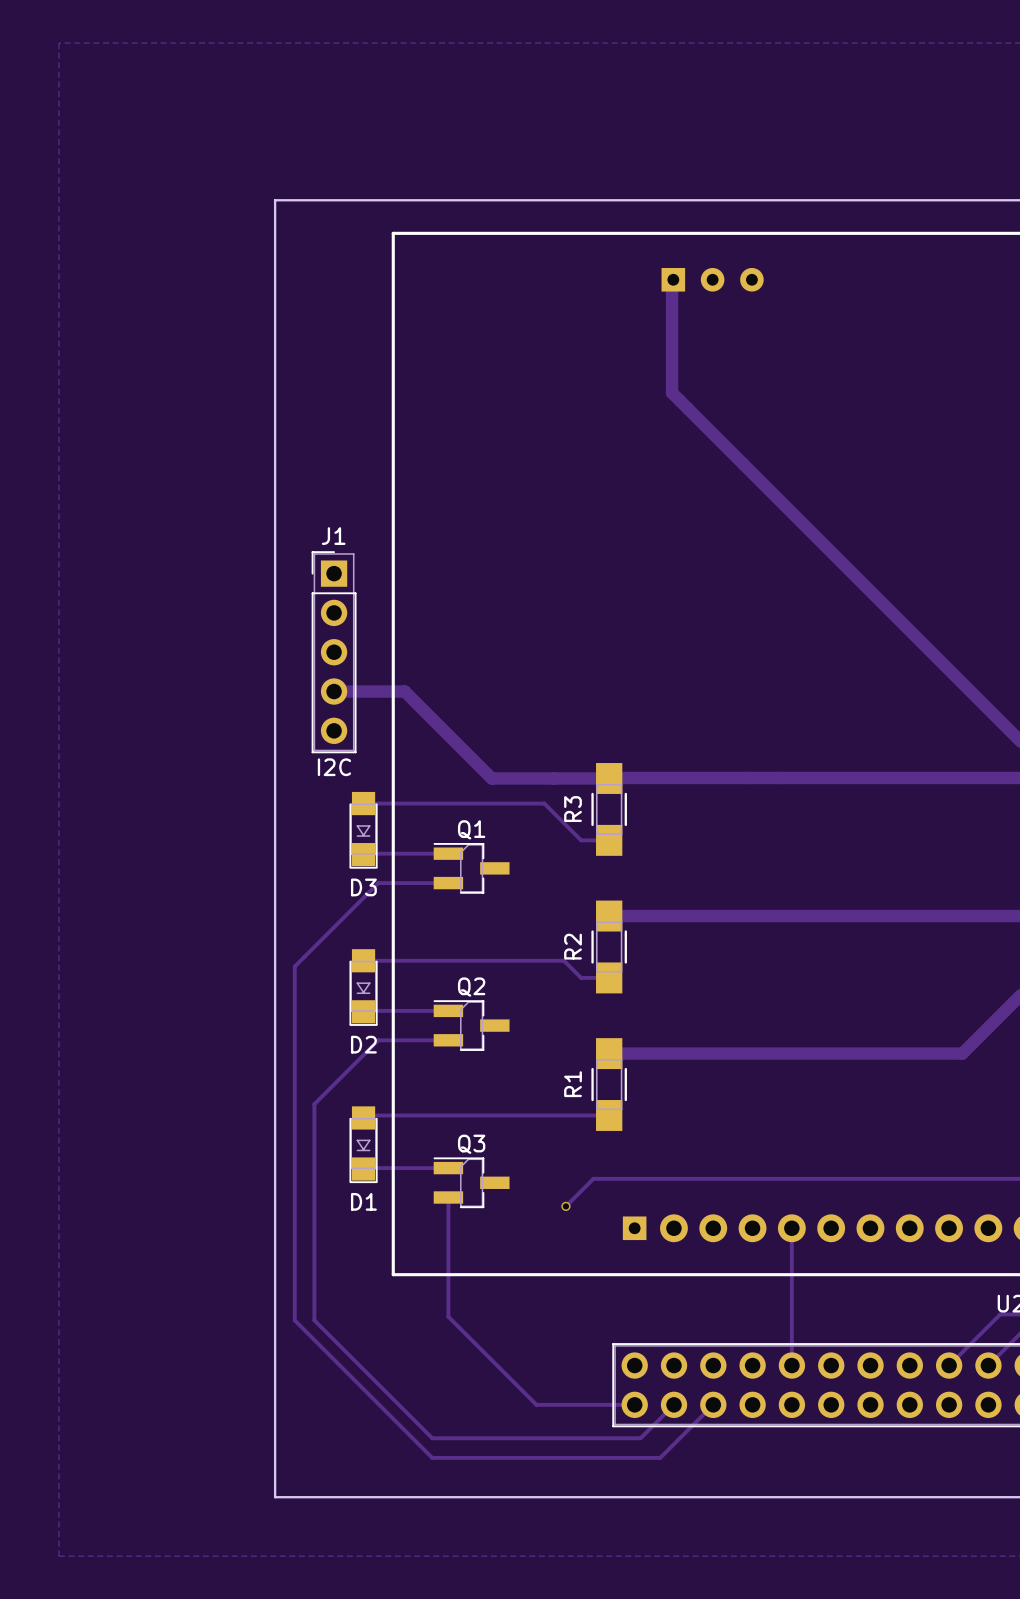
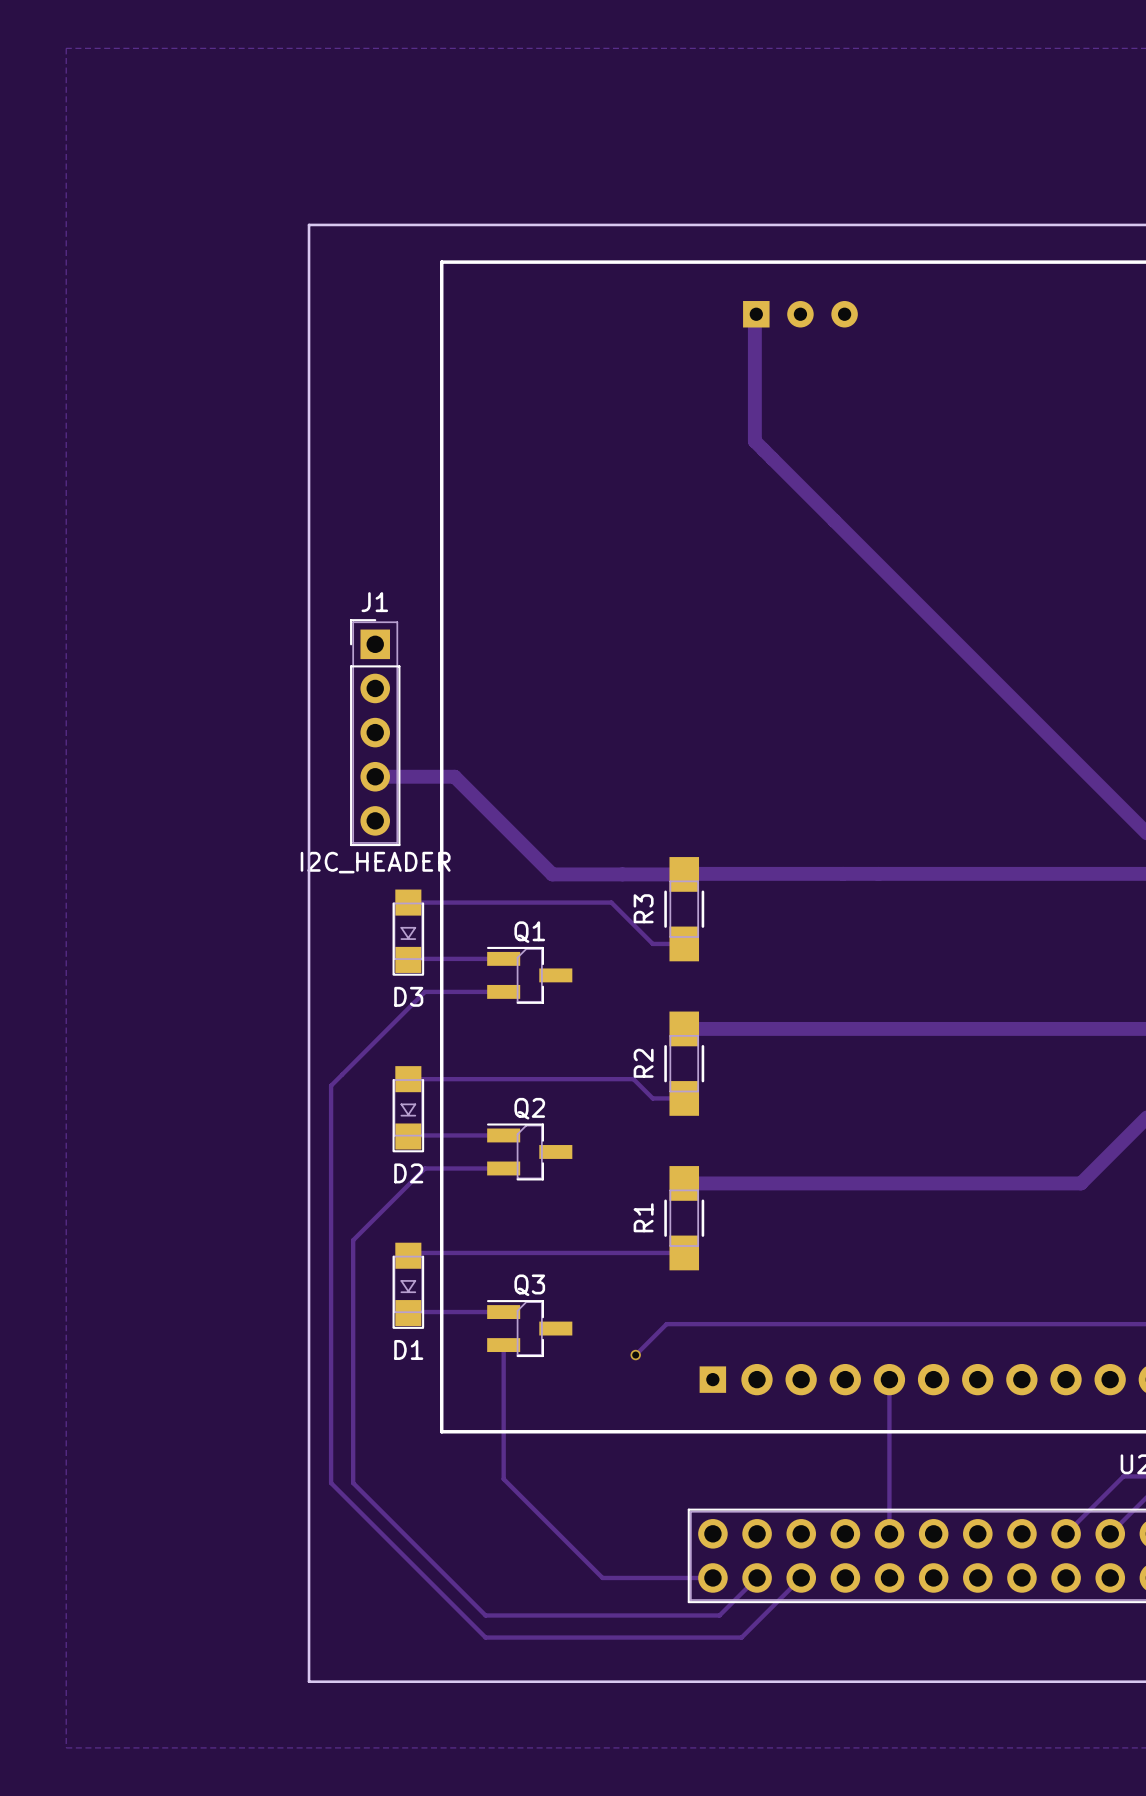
J1 value: I2C (334, 767) -> I2C_HEADER (375, 862)

